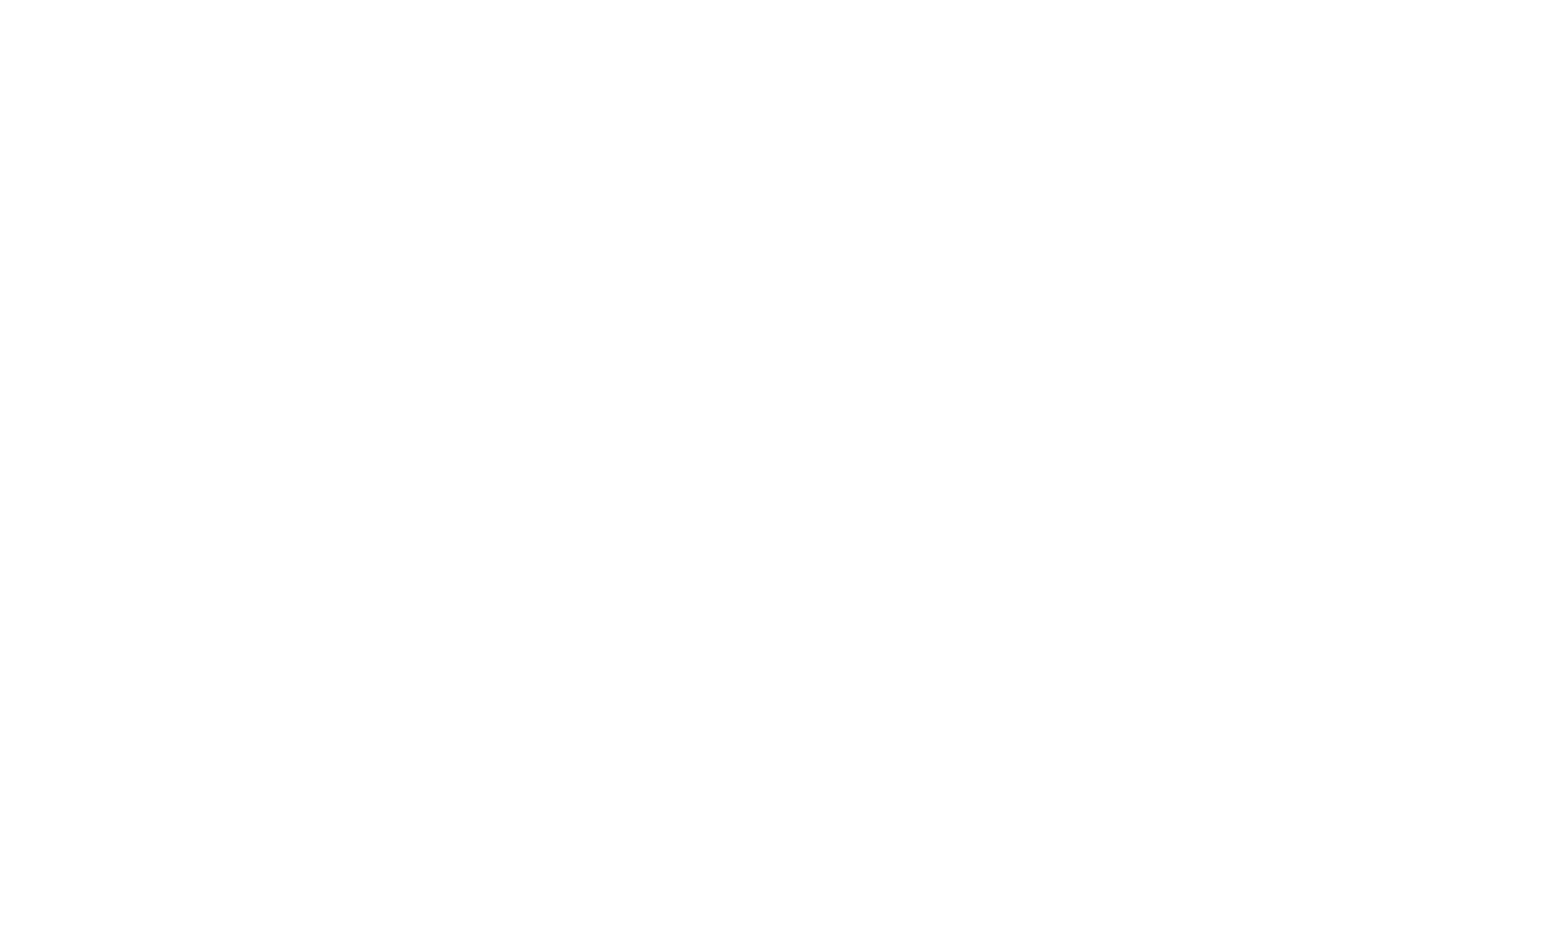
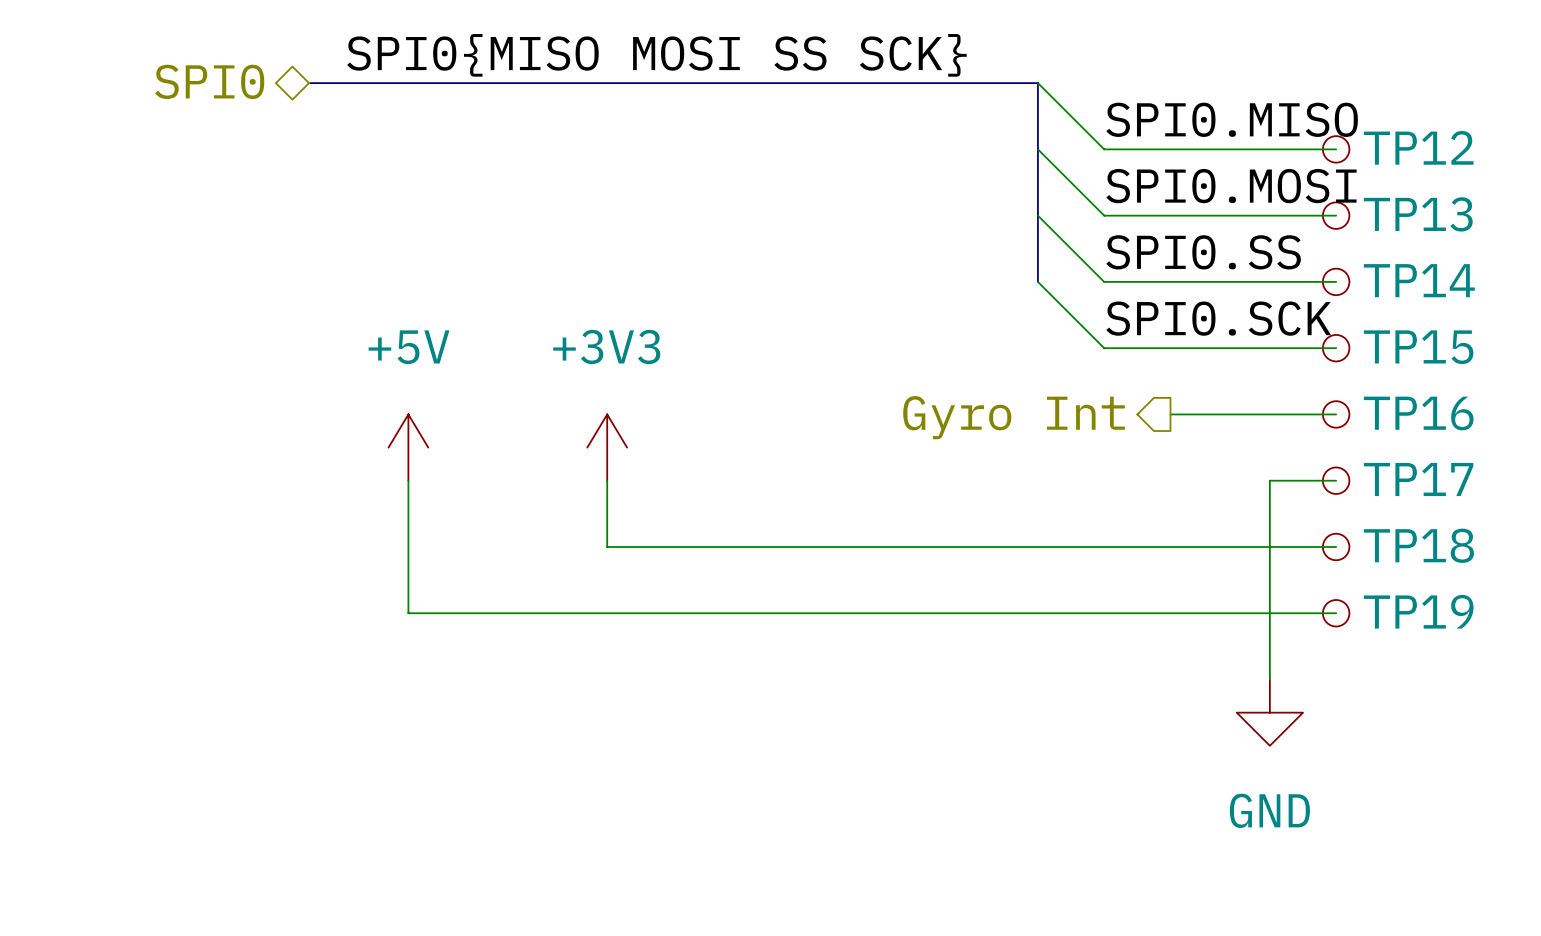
label: none -> SPI0{MISO MOSI SS SCK} (656, 55)
hierarchical label: none -> SPI0 (209, 81)
bus: none -> (309, 83) (1037, 83) (1037, 281)
wire: none -> (1037, 83) (1104, 149) (1336, 149)
label: none -> SPI0.MISO (1232, 119)
wire: none -> (1037, 149) (1104, 215) (1336, 215)
TP12: none -> (1336, 149)
label: none -> SPI0.MOSI (1231, 186)
wire: none -> (1037, 215) (1104, 281) (1336, 281)
TP13: none -> (1336, 215)
label: none -> SPI0.SS (1203, 252)
wire: none -> (1037, 281) (1104, 348) (1336, 348)
TP14: none -> (1336, 281)
label: none -> SPI0.SCK (1218, 318)
TP15: none -> (1336, 348)
wire: none -> (1170, 414) (1336, 414)
TP16: none -> (1336, 414)
hierarchical label: none -> Gyro Int (1014, 417)
power symbol: none -> +5V (408, 447)
power symbol: none -> +3V3 (607, 447)
wire: none -> (408, 480) (408, 613) (1336, 613)
wire: none -> (607, 480) (607, 546) (1336, 546)
wire: none -> (1336, 480) (1269, 480) (1269, 679)
TP17: none -> (1336, 480)
TP18: none -> (1336, 546)
TP19: none -> (1336, 613)
power symbol: none -> GND (1269, 712)

